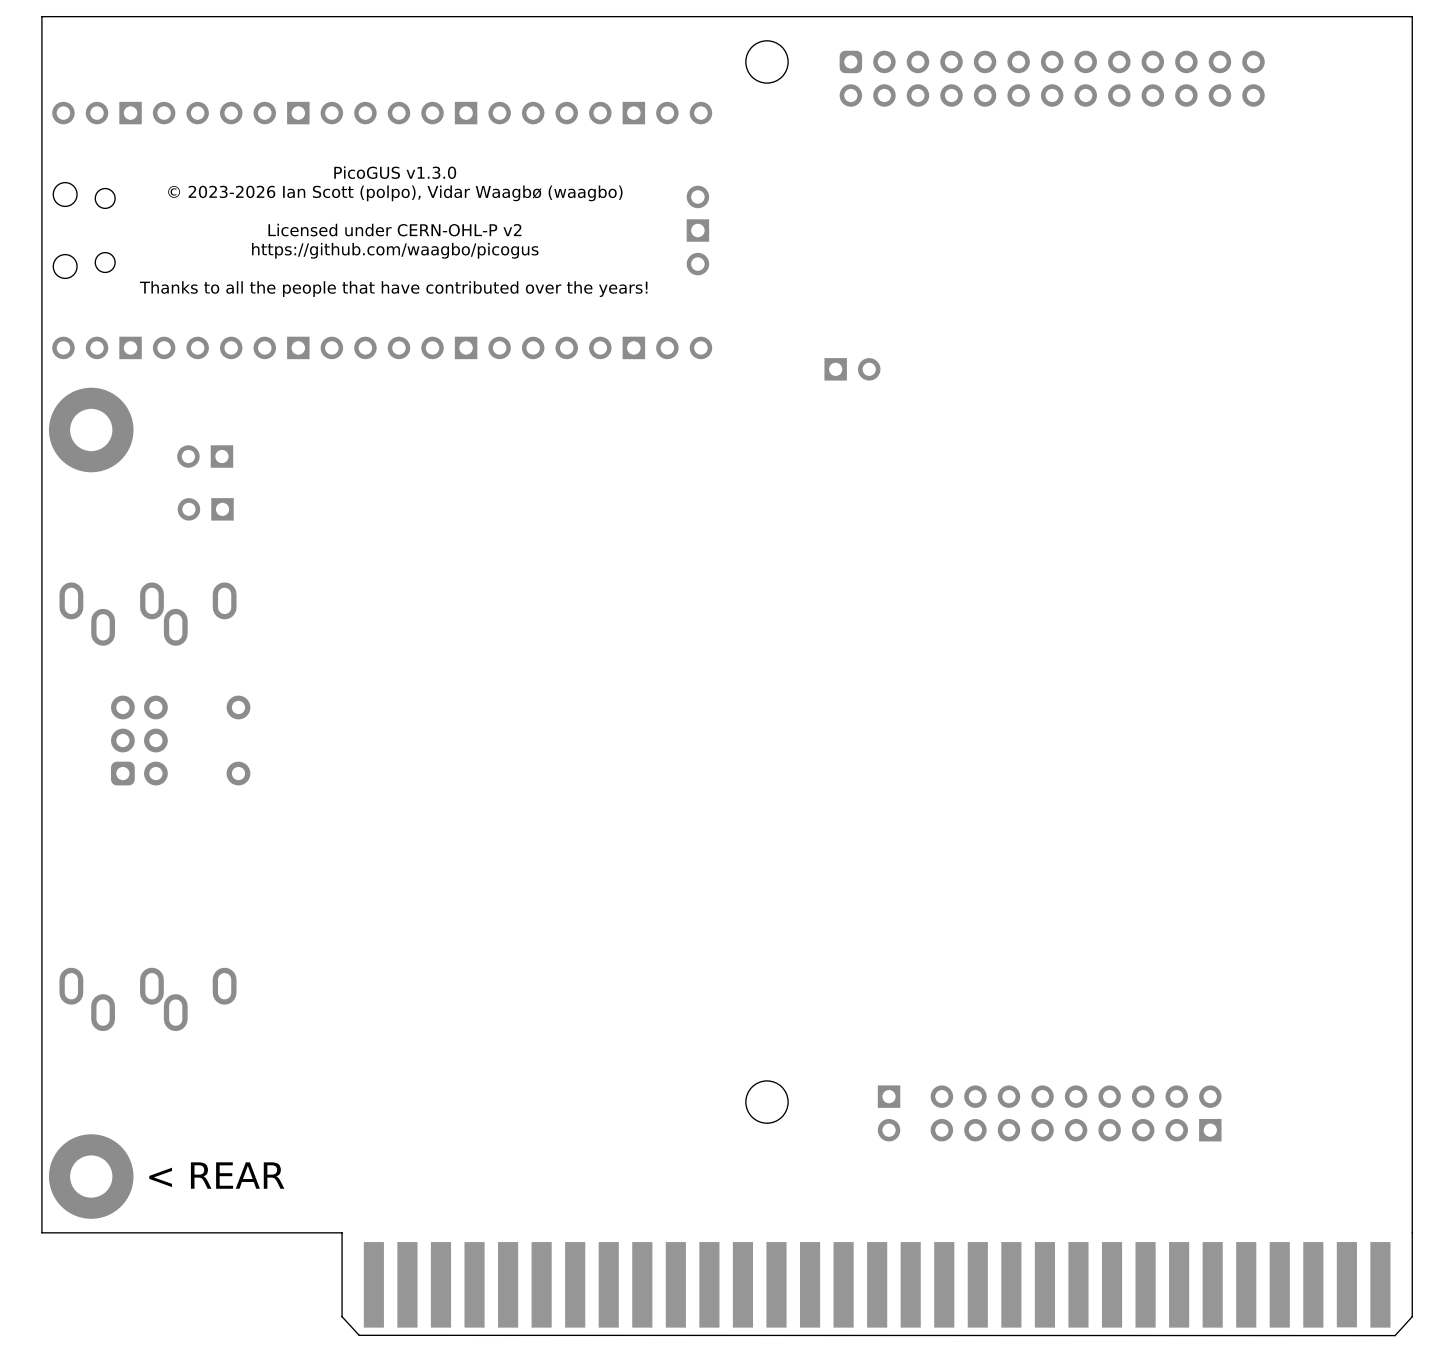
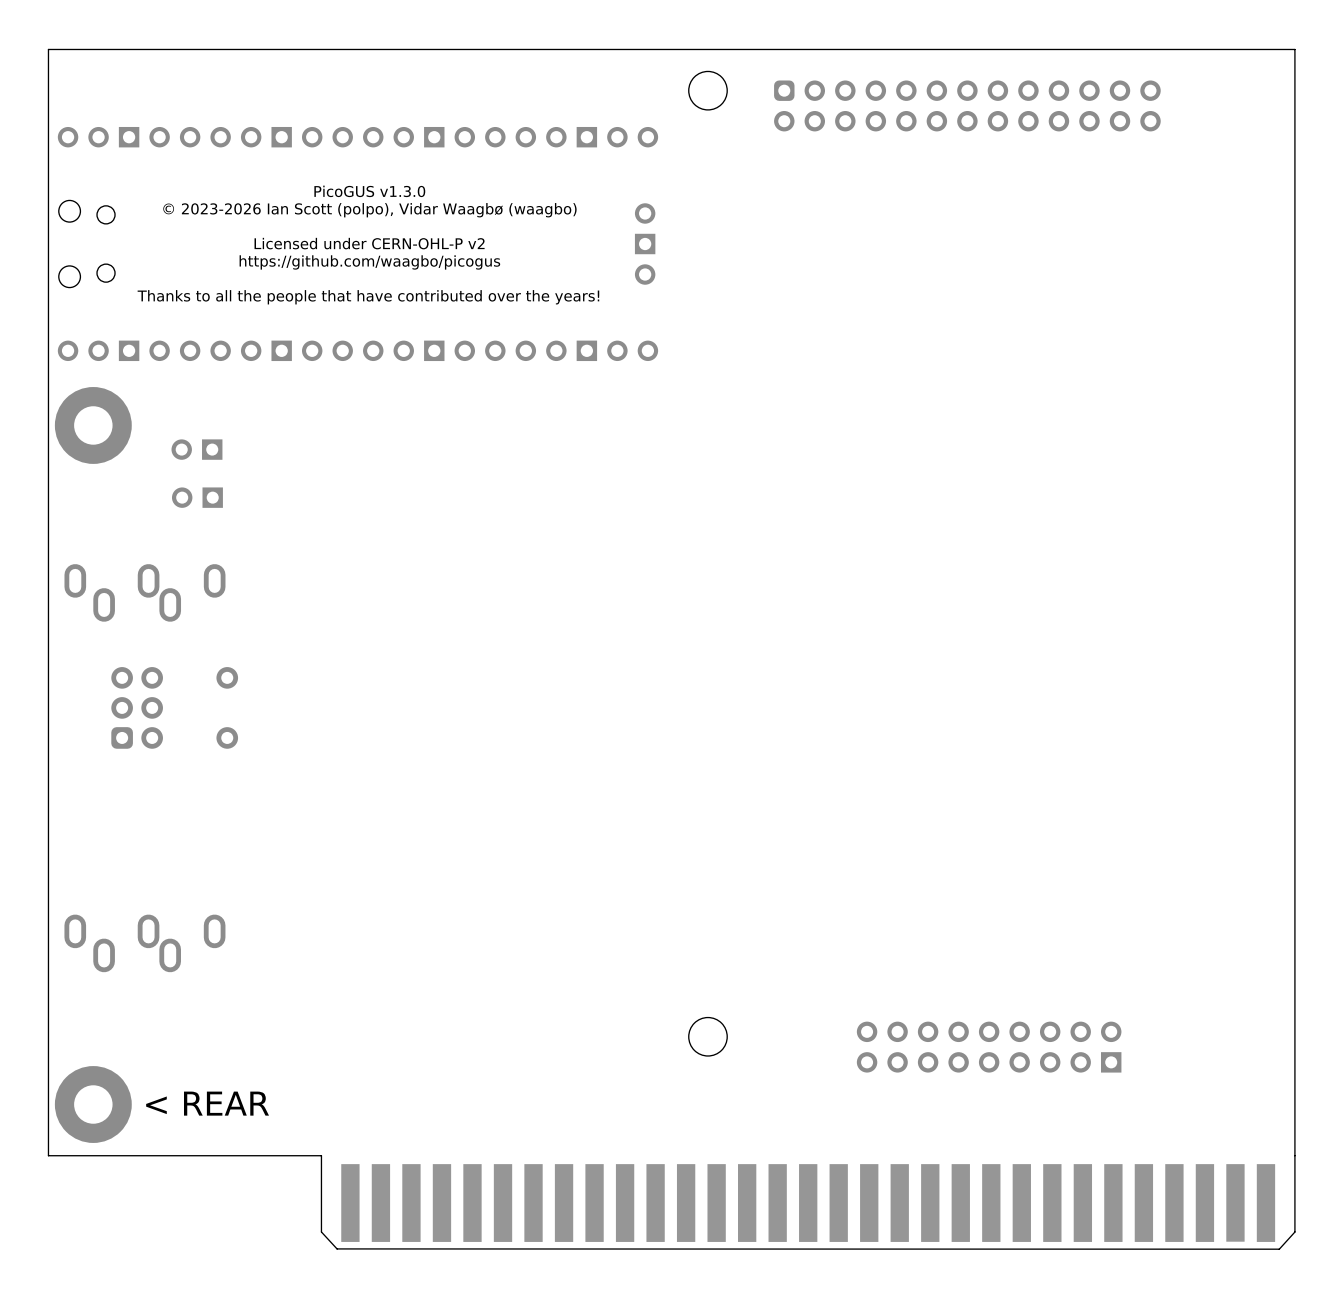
part: (852, 369) -> none
part: (889, 1113) -> none

